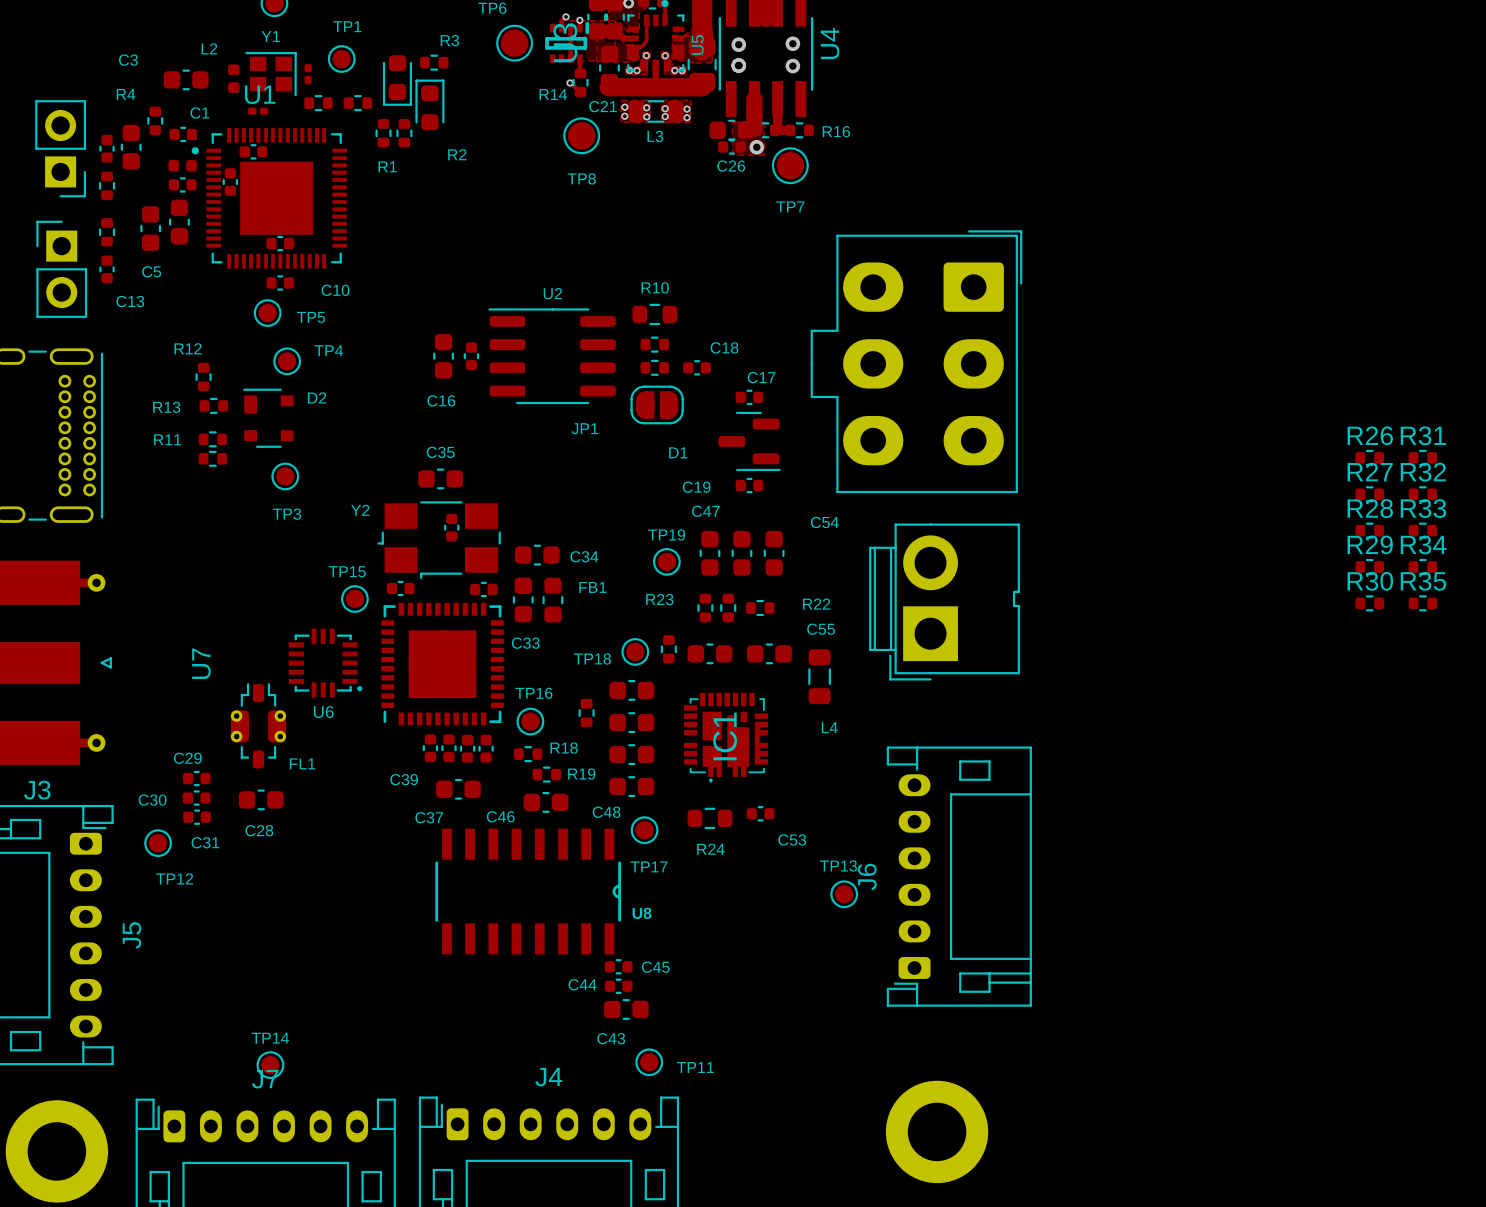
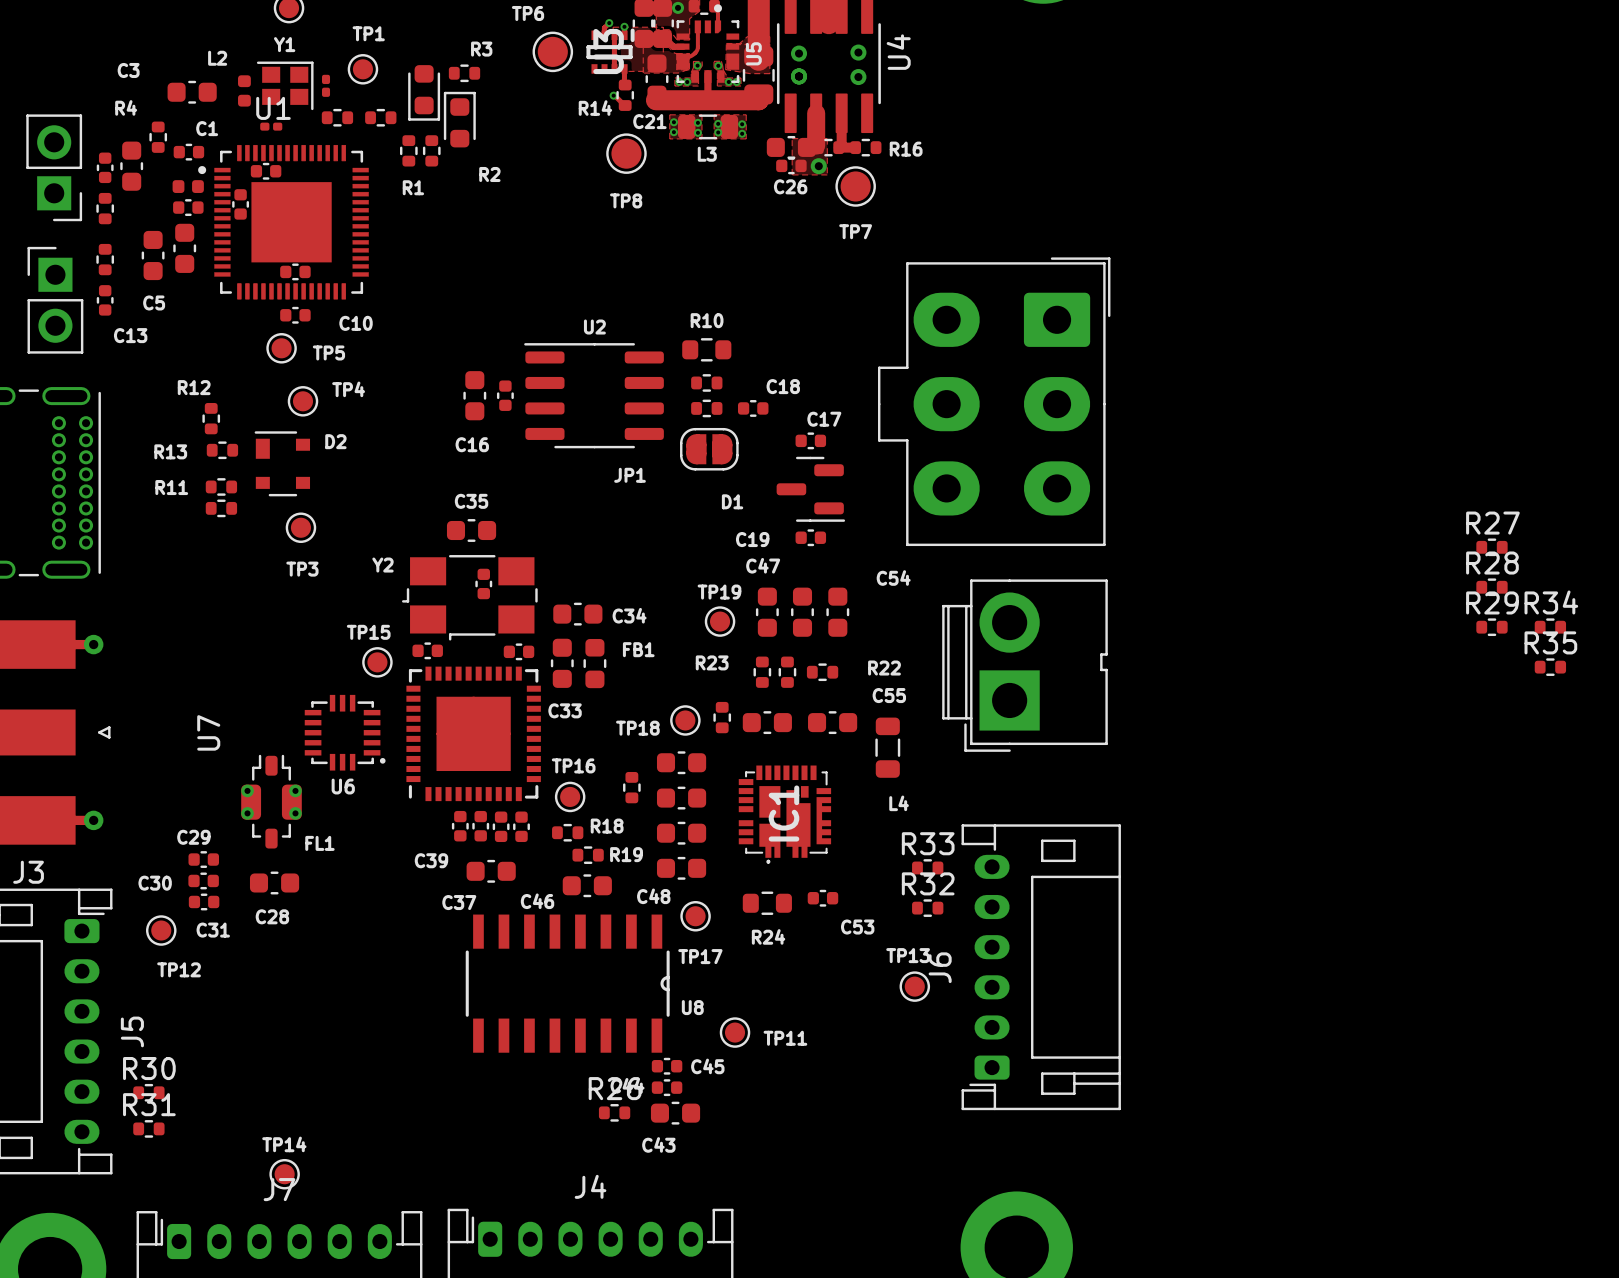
R26 position: (1369, 457) -> (614, 1112)
R31 position: (1422, 457) -> (148, 1128)
R32 position: (1422, 494) -> (927, 908)
R33 position: (1422, 530) -> (927, 867)
R30 position: (1369, 603) -> (148, 1092)
TP11 position: (649, 1062) -> (735, 1032)

